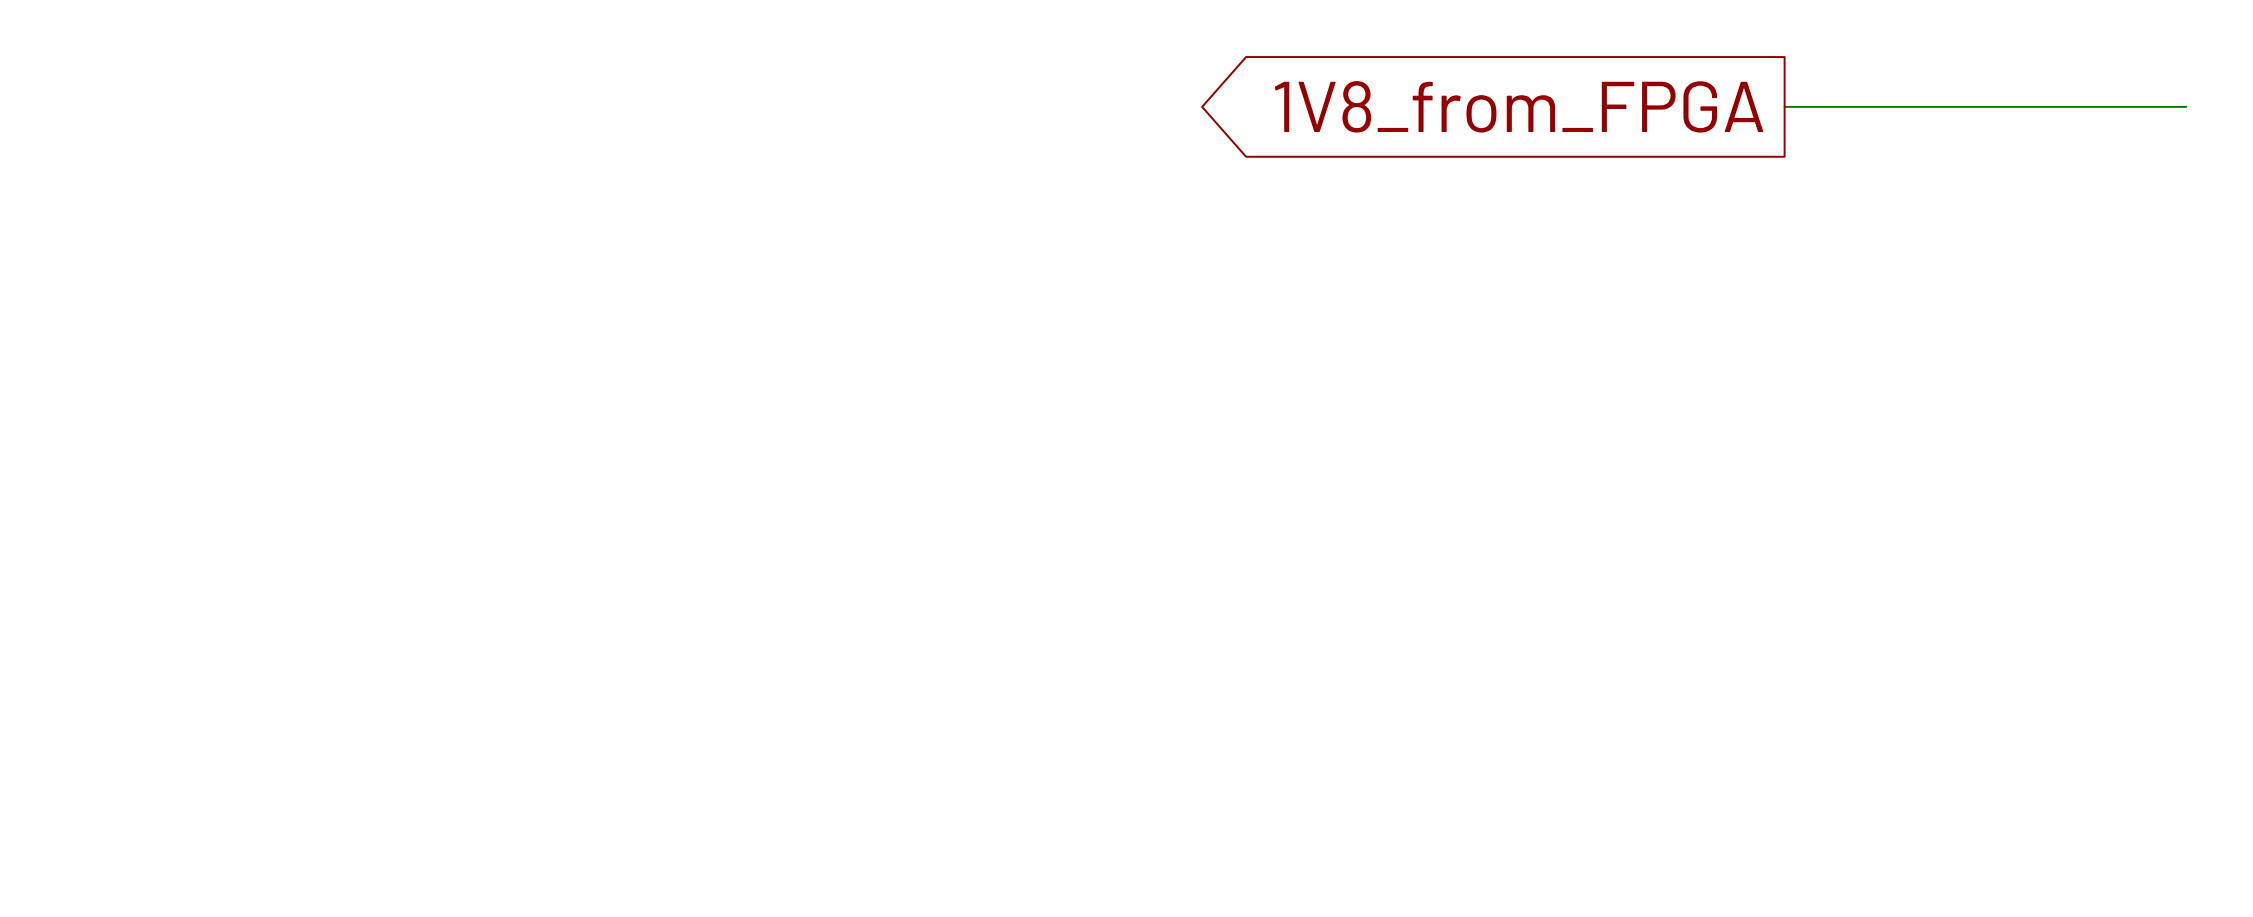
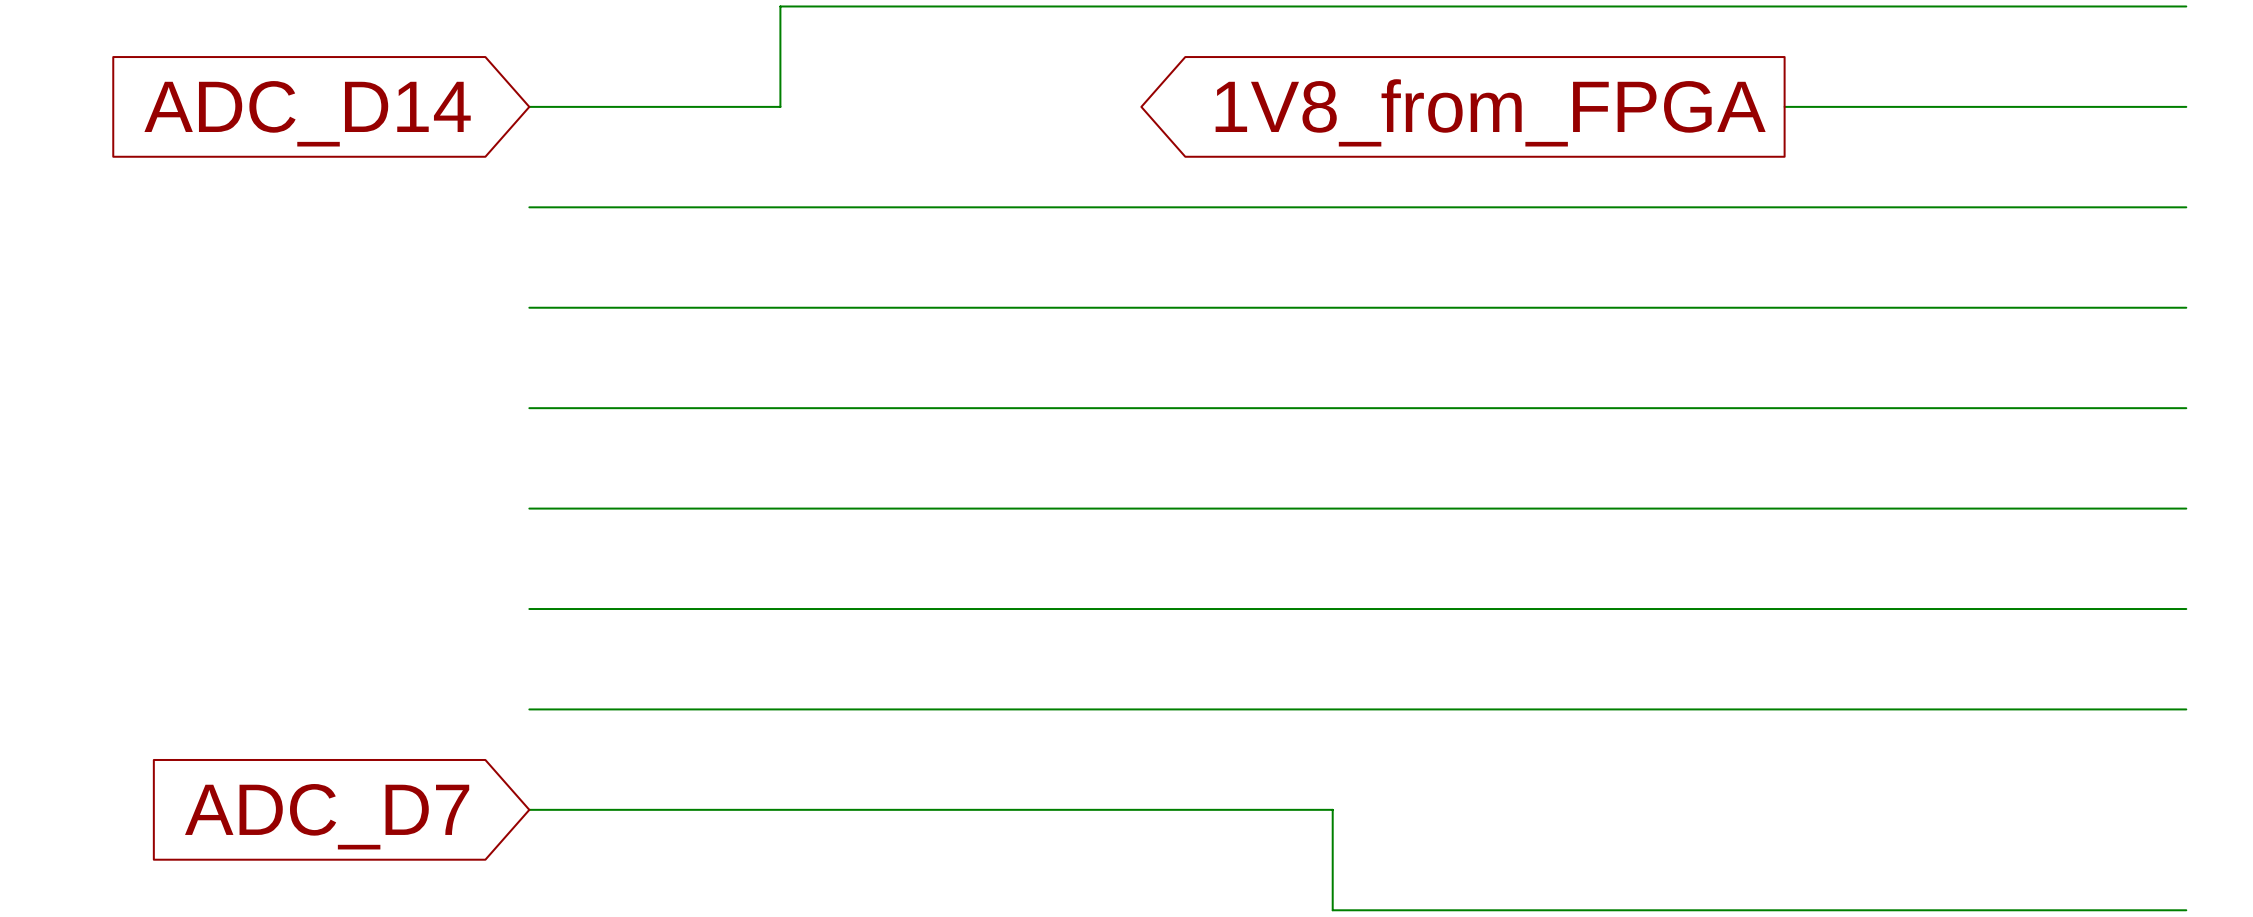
wire: none -> (2186, 6) (780, 6) (780, 106) (529, 106)
global label: none -> ADC_D14 (307, 113)
wire: none -> (529, 207) (2186, 207)
wire: none -> (529, 307) (2186, 307)
wire: none -> (529, 408) (2186, 408)
wire: none -> (529, 508) (2186, 508)
wire: none -> (529, 609) (2186, 609)
wire: none -> (529, 709) (2186, 709)
global label: none -> ADC_D7 (327, 816)
wire: none -> (529, 809) (1332, 809) (1332, 910) (2186, 910)

